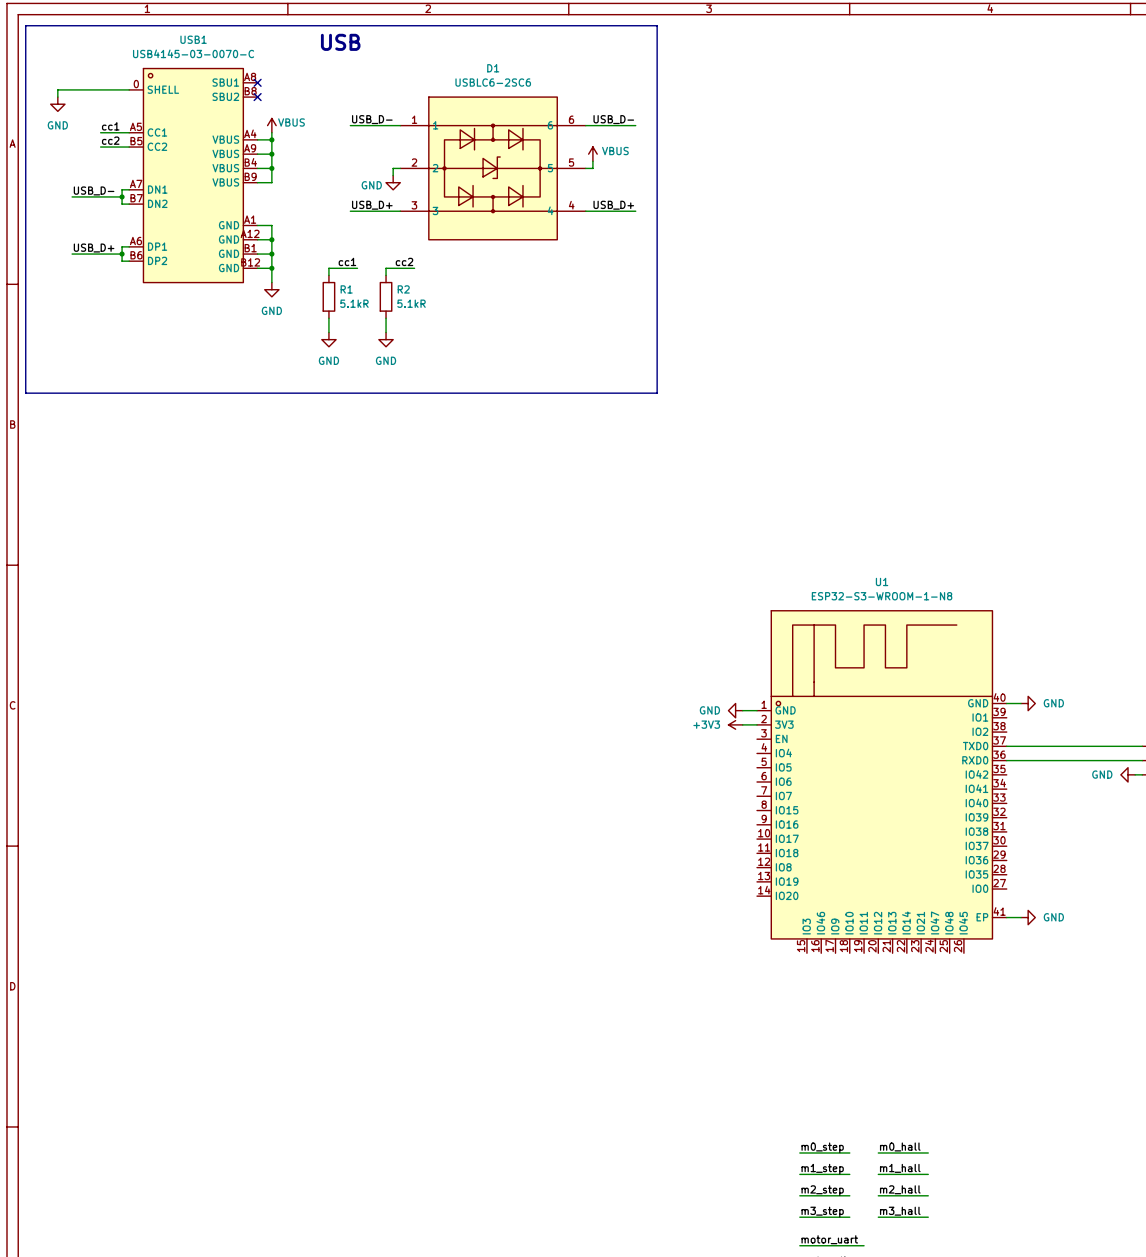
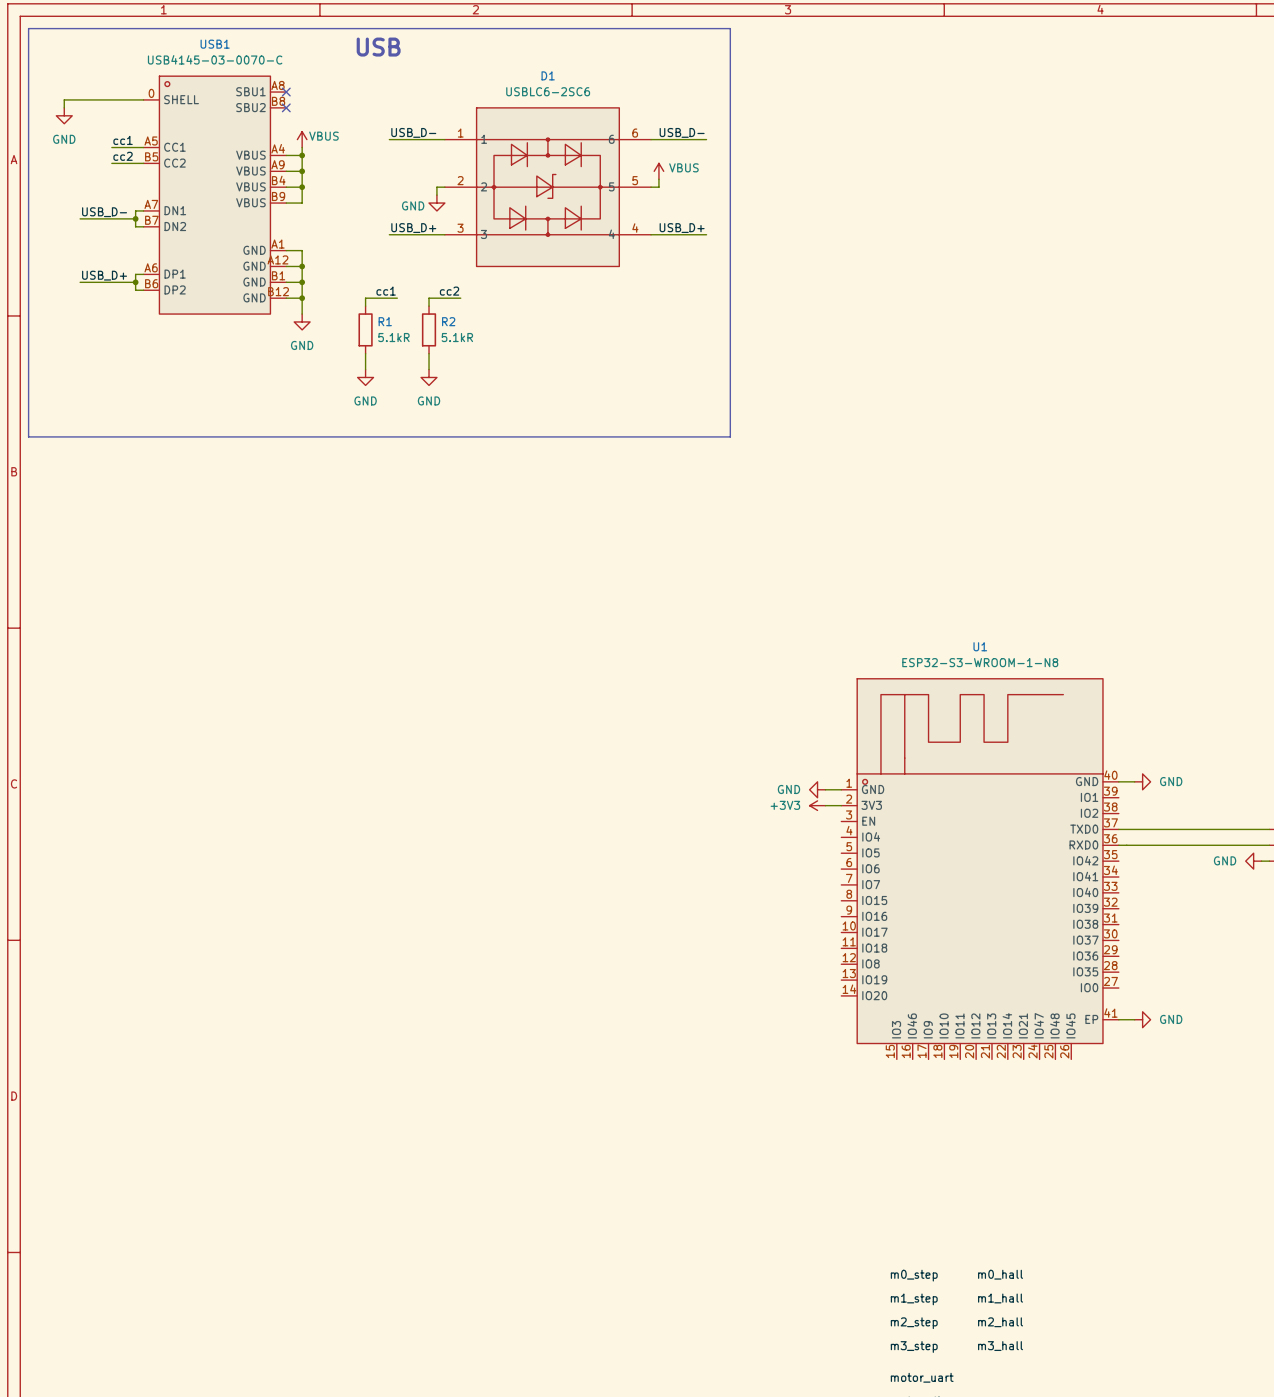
wire: (799, 1152) (849, 1152) -> none
wire: (878, 1152) (928, 1152) -> none
wire: (799, 1174) (849, 1174) -> none
wire: (878, 1174) (928, 1174) -> none
wire: (799, 1195) (849, 1195) -> none
wire: (878, 1195) (928, 1195) -> none
wire: (799, 1217) (849, 1217) -> none
wire: (878, 1217) (928, 1217) -> none
wire: (799, 1245) (864, 1245) -> none

